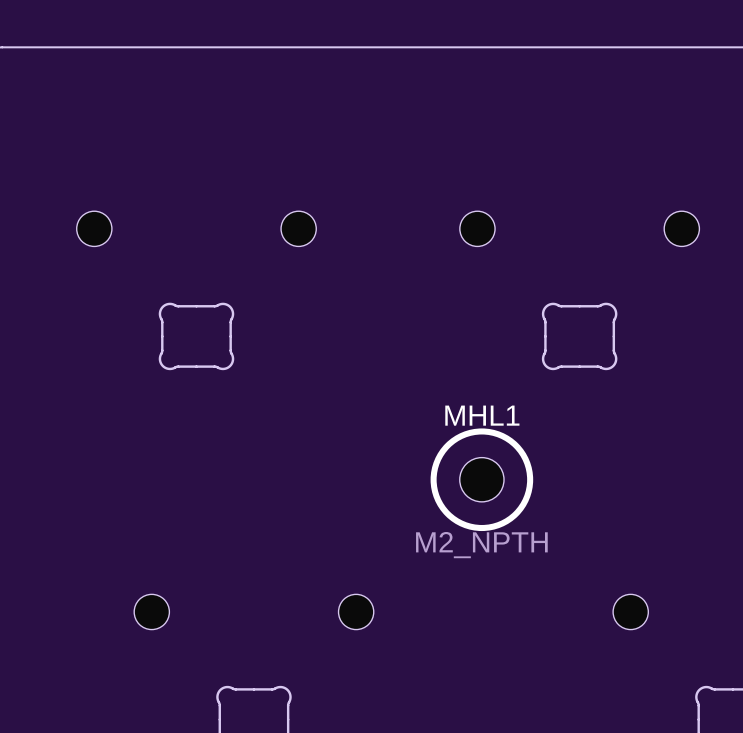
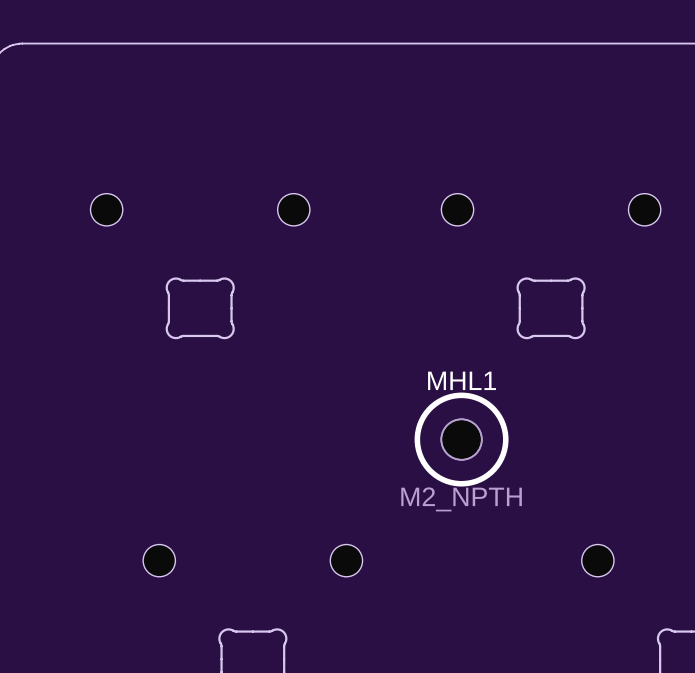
MHL1 footprint: [430, 428, 534, 532] -> [414, 392, 509, 487]

